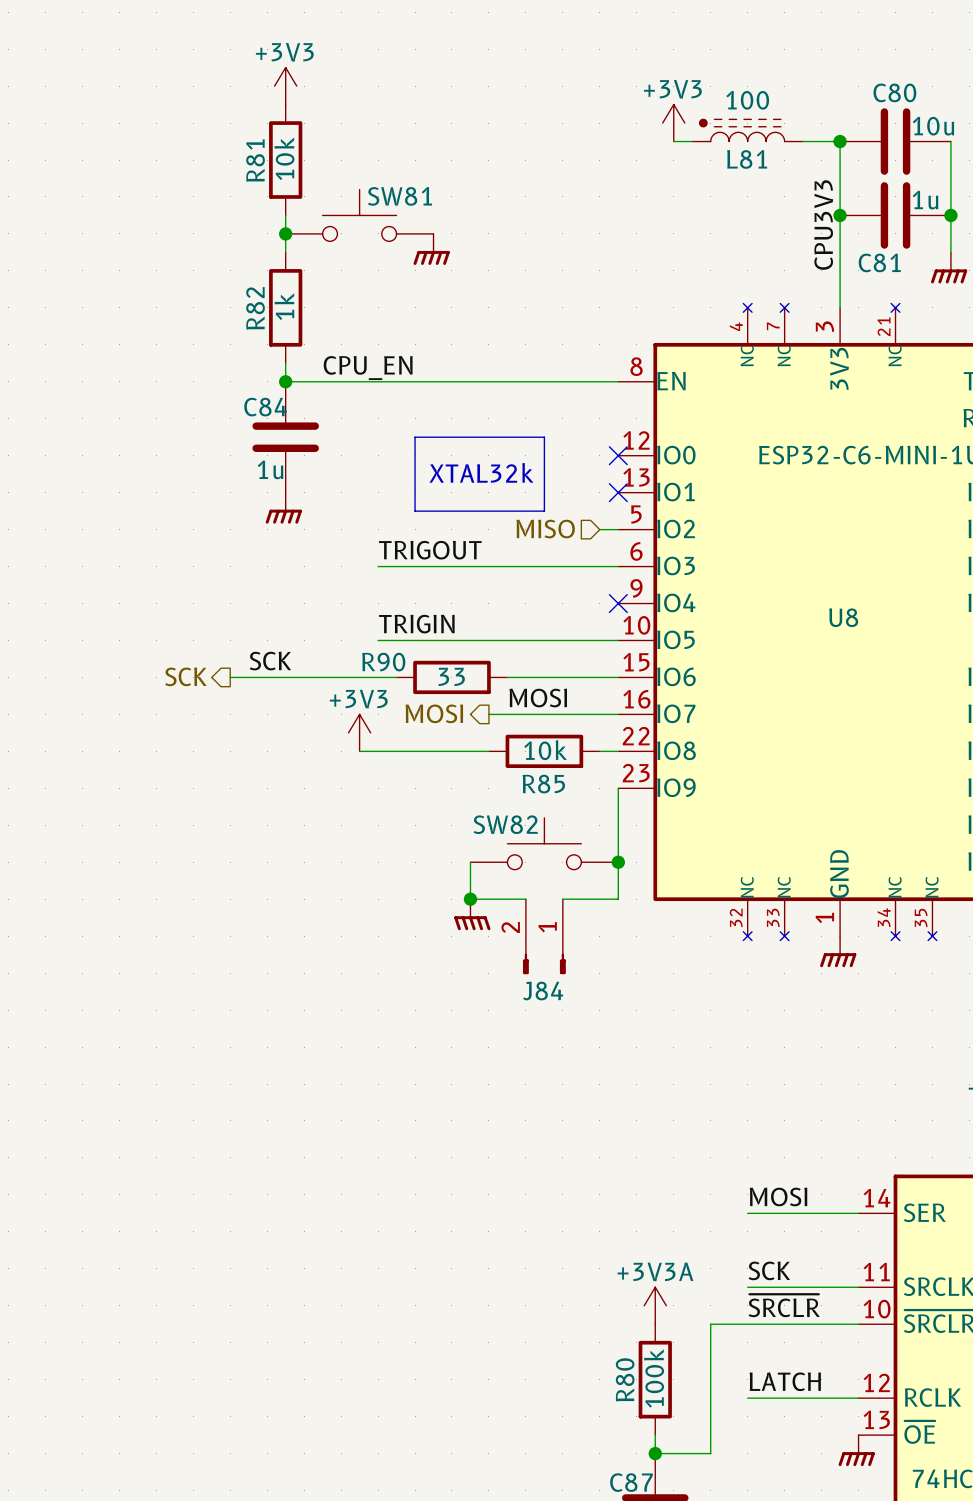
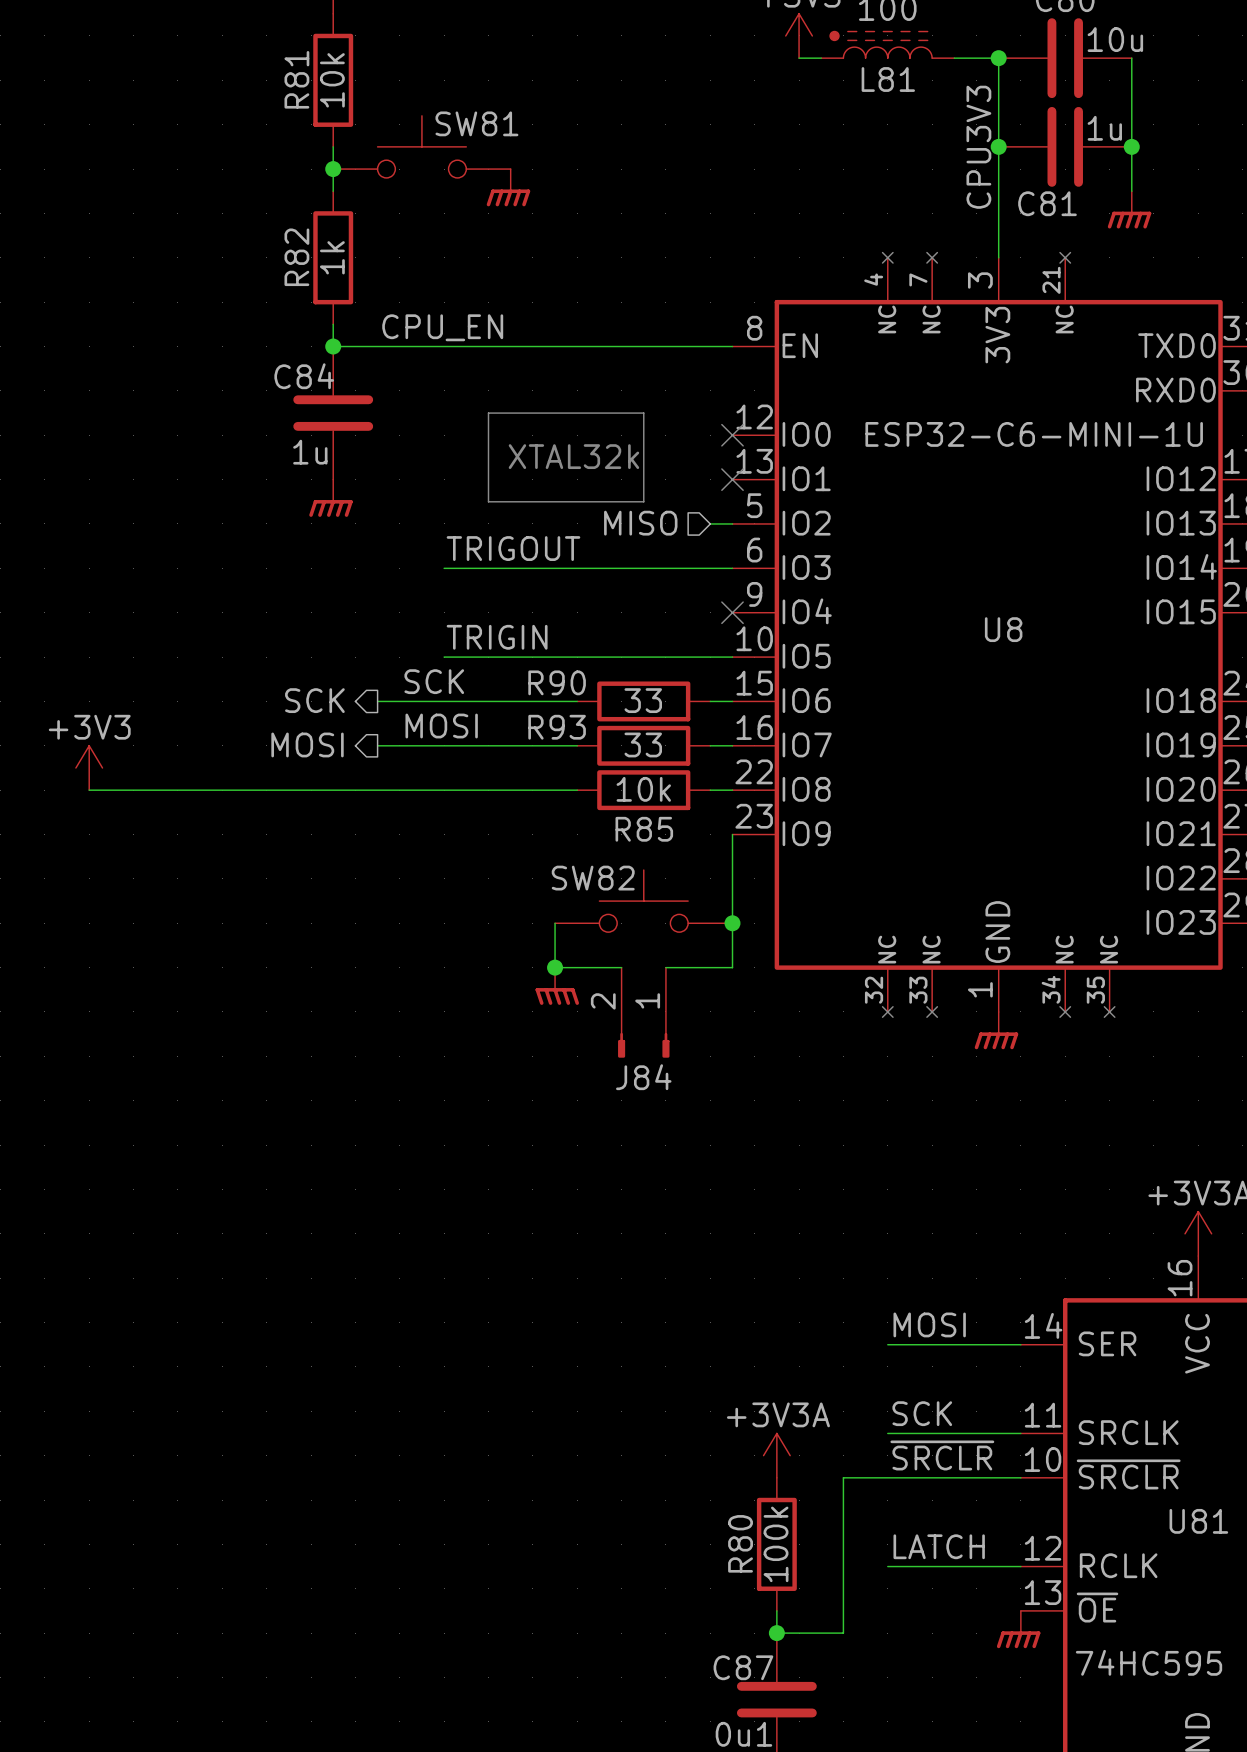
label position: SCK (270, 661) -> SCK (434, 681)
hierarchical label position: SCK (185, 676) -> SCK (314, 700)
wire: (230, 677) (322, 677) -> none
R90 position: (451, 677) -> (643, 701)
wire: (507, 677) (599, 677) -> (466, 701) (577, 701)
label position: MOSI (538, 698) -> MOSI (441, 726)
hierarchical label position: MOSI (434, 713) -> MOSI (307, 744)
wire: (488, 714) (599, 714) -> (577, 745) (377, 745)
R93: none -> 33 (643, 745)
power symbol position: +3V3 (359, 732) -> +3V3 (89, 767)
wire: none -> (89, 790) (421, 790)

